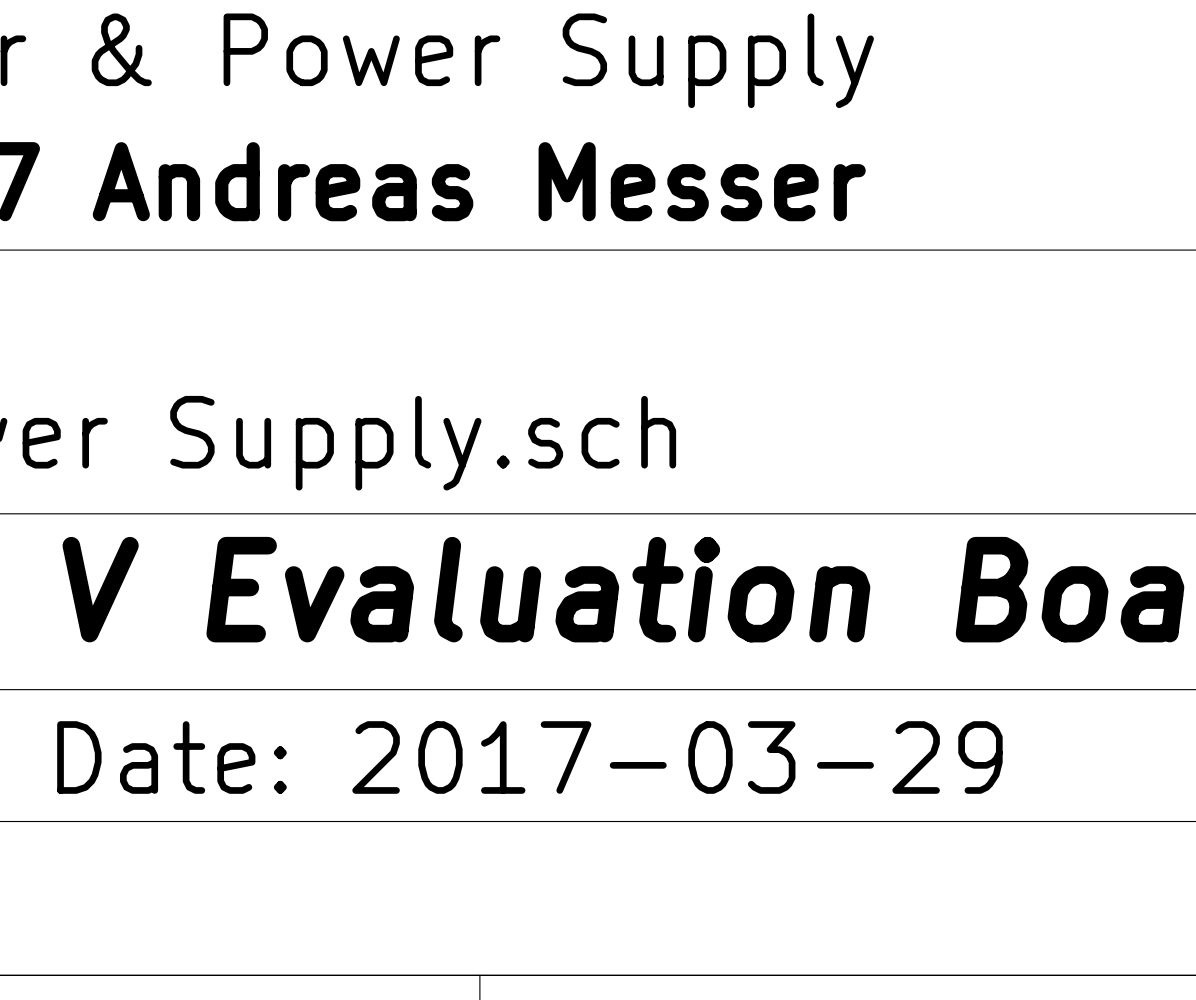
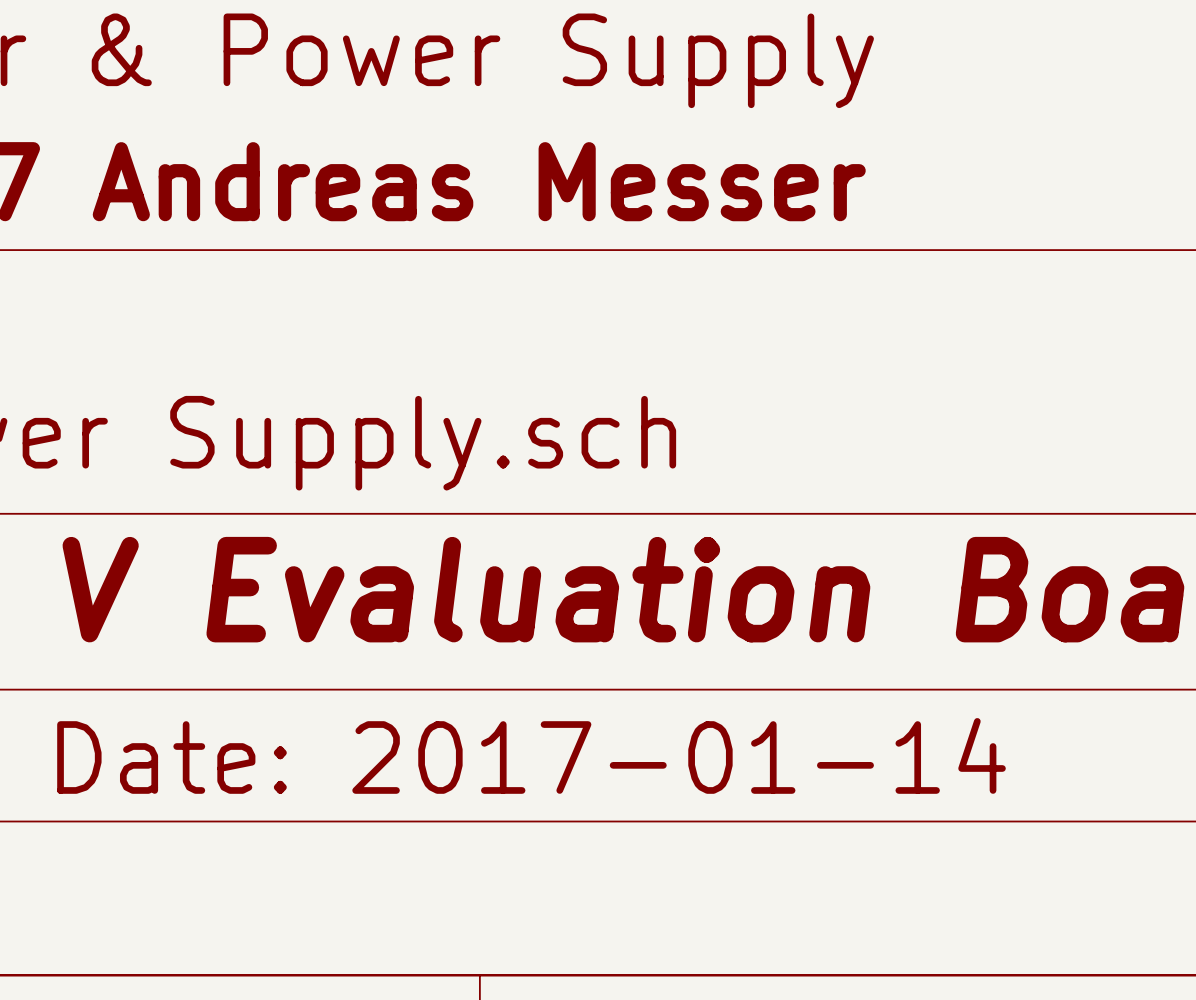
title block: Date: 2017-03-29 (529, 757) -> Date: 2017-01-14 (531, 755)

